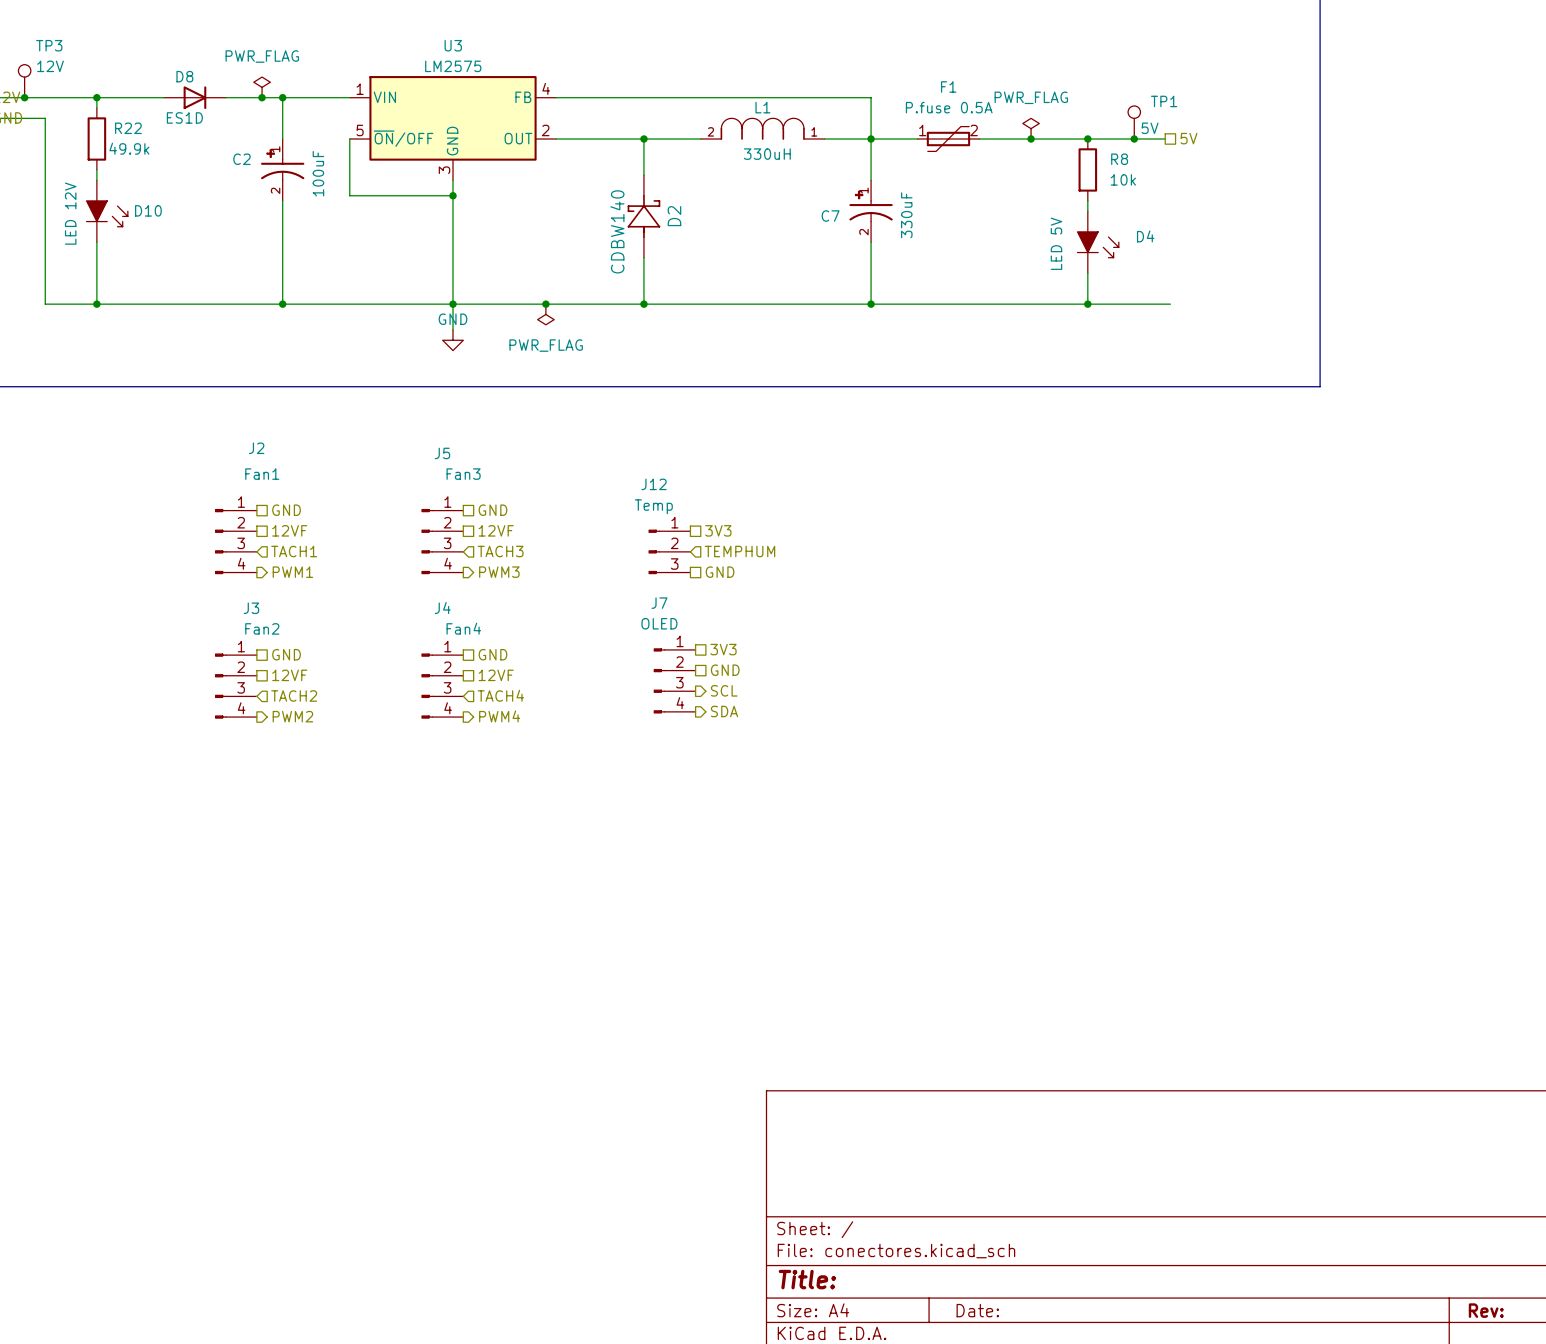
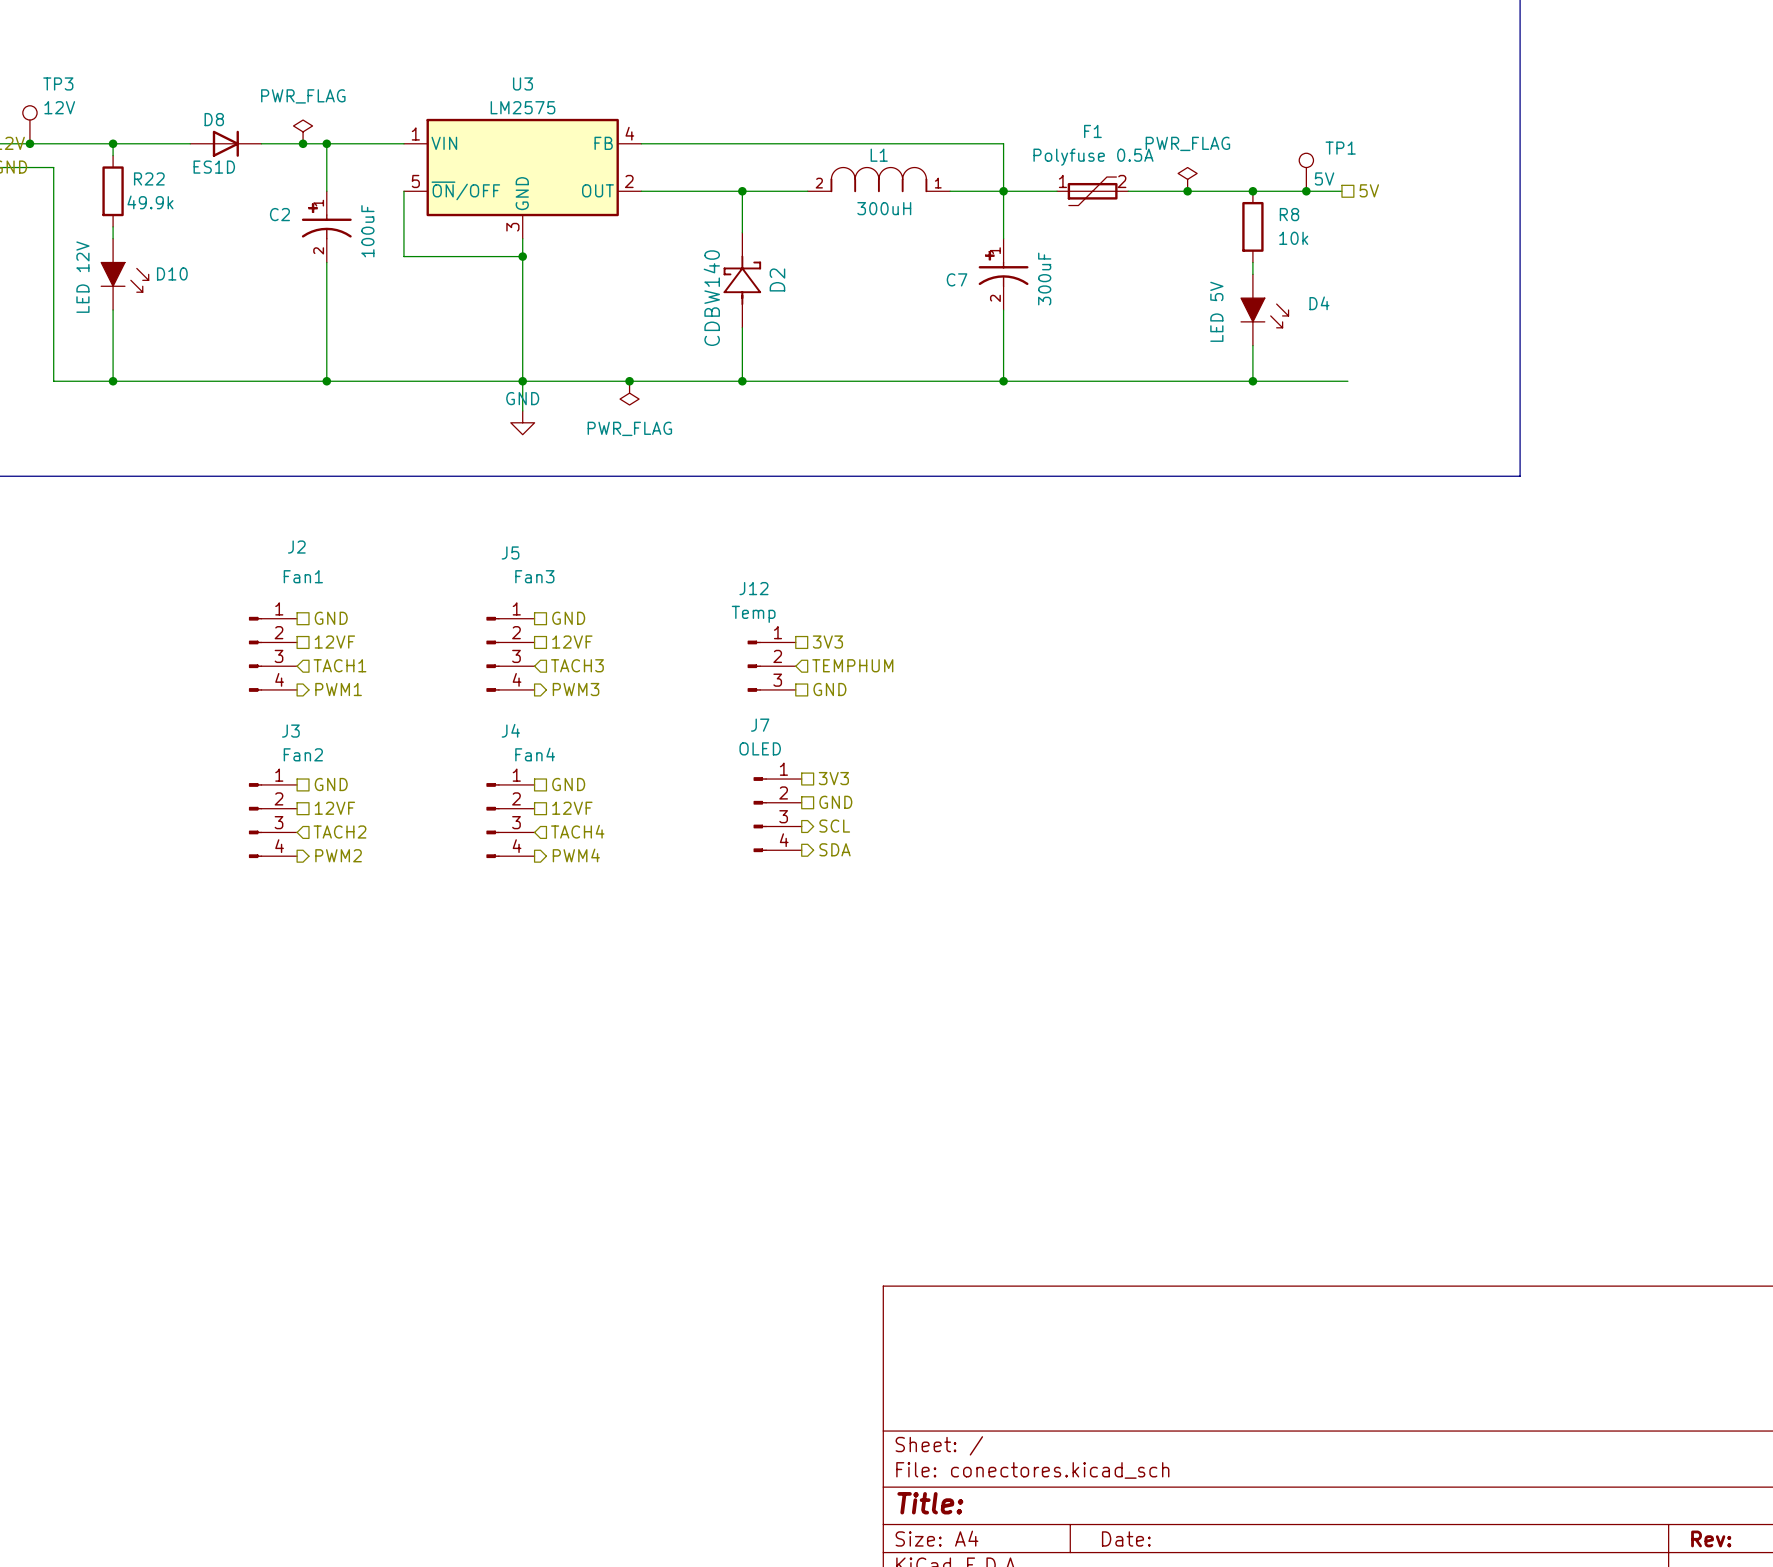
F1 value: P.fuse 0.5A (949, 107) -> Polyfuse 0.5A (1093, 157)
L1 value: 330uH (767, 154) -> 300uH (884, 208)
C7 value: 330uF (906, 215) -> 300uF (1044, 279)

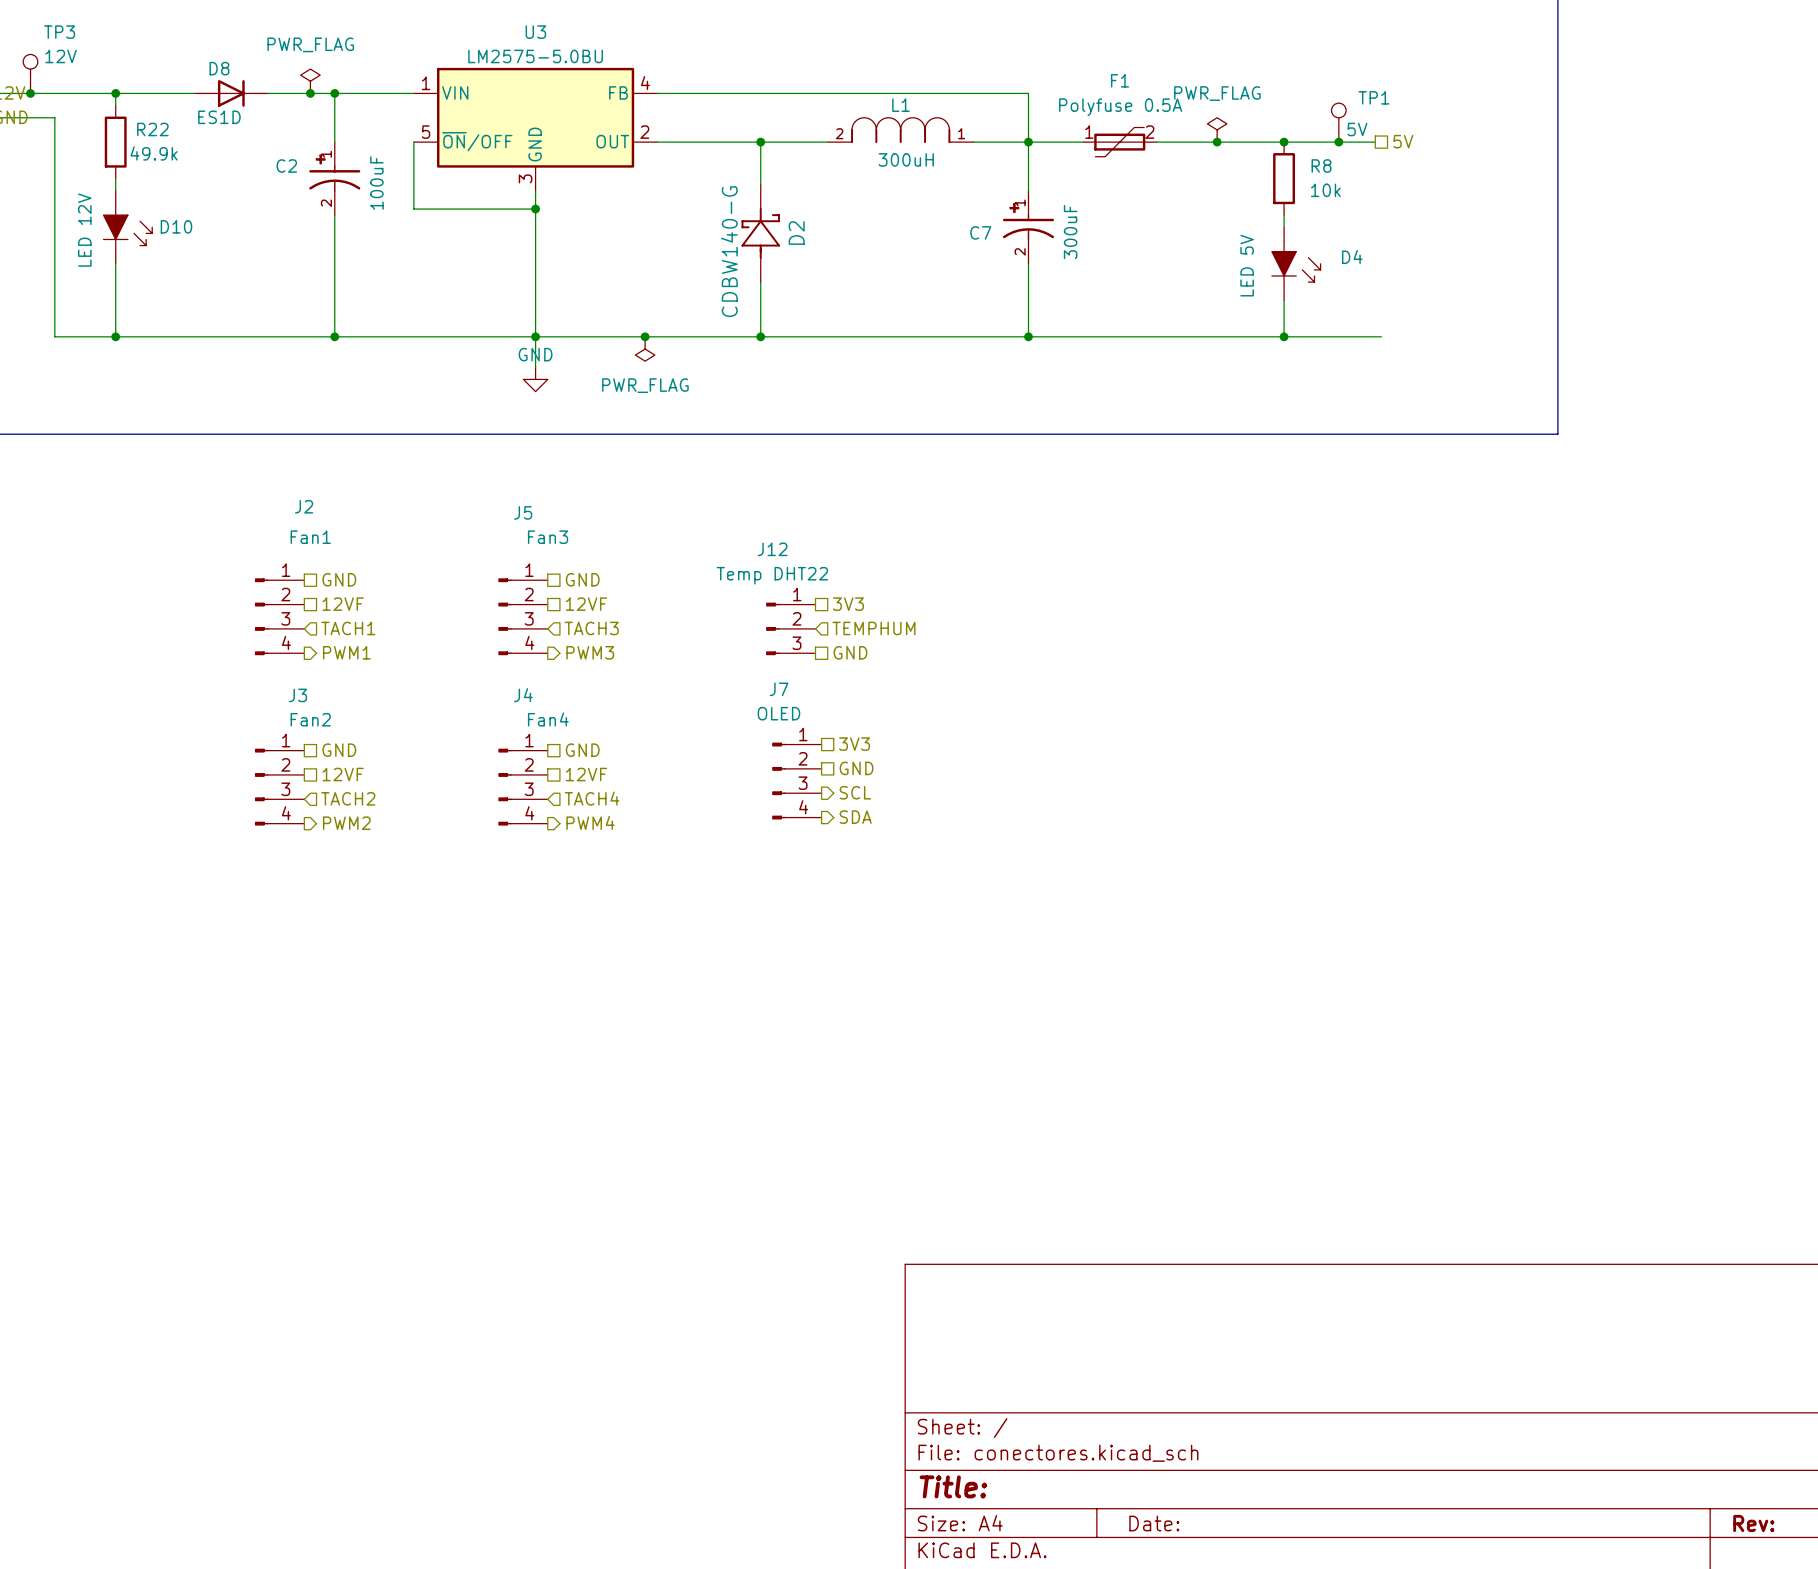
U3 value: LM2575 (522, 107) -> LM2575-5.0BU (535, 56)
D2 value: CDBW140 (711, 298) -> CDBW140-G (729, 251)
J12 value: Temp (753, 614) -> Temp DHT22 (772, 575)

